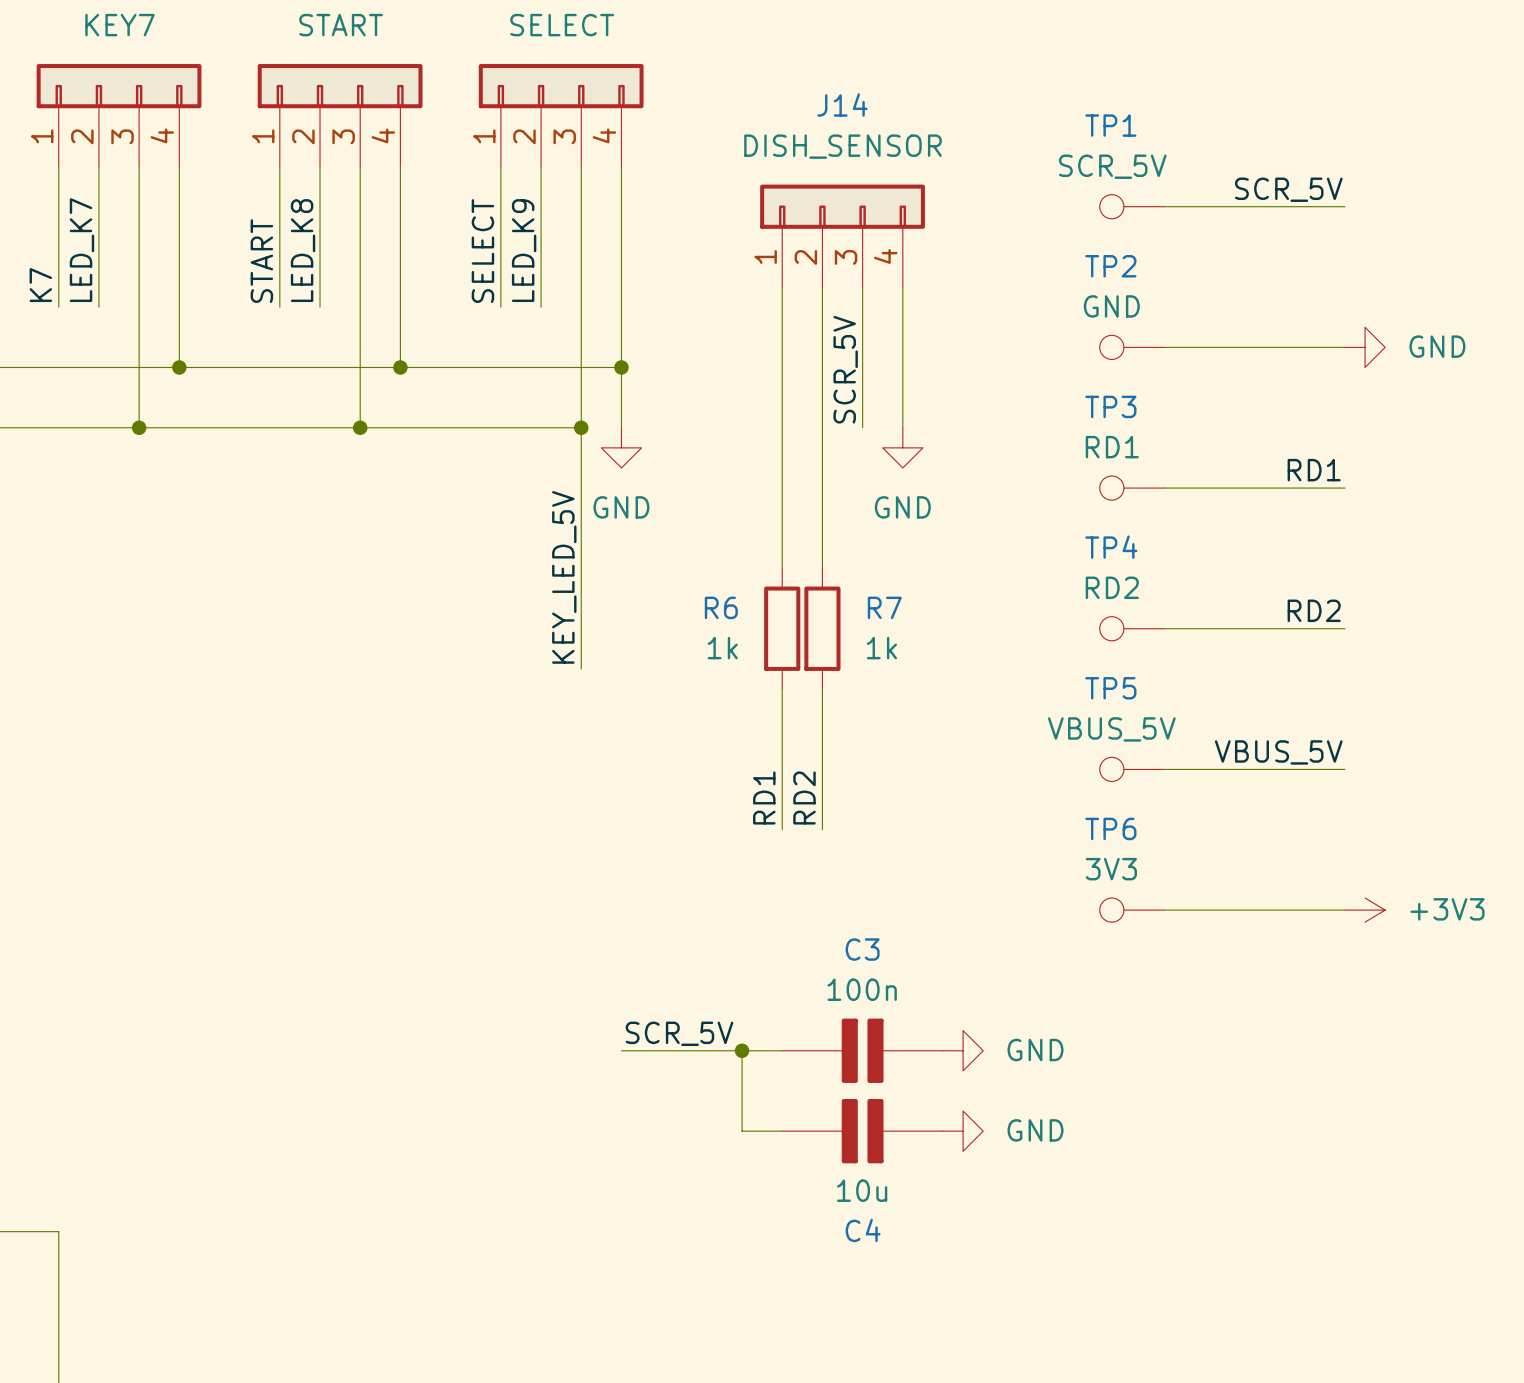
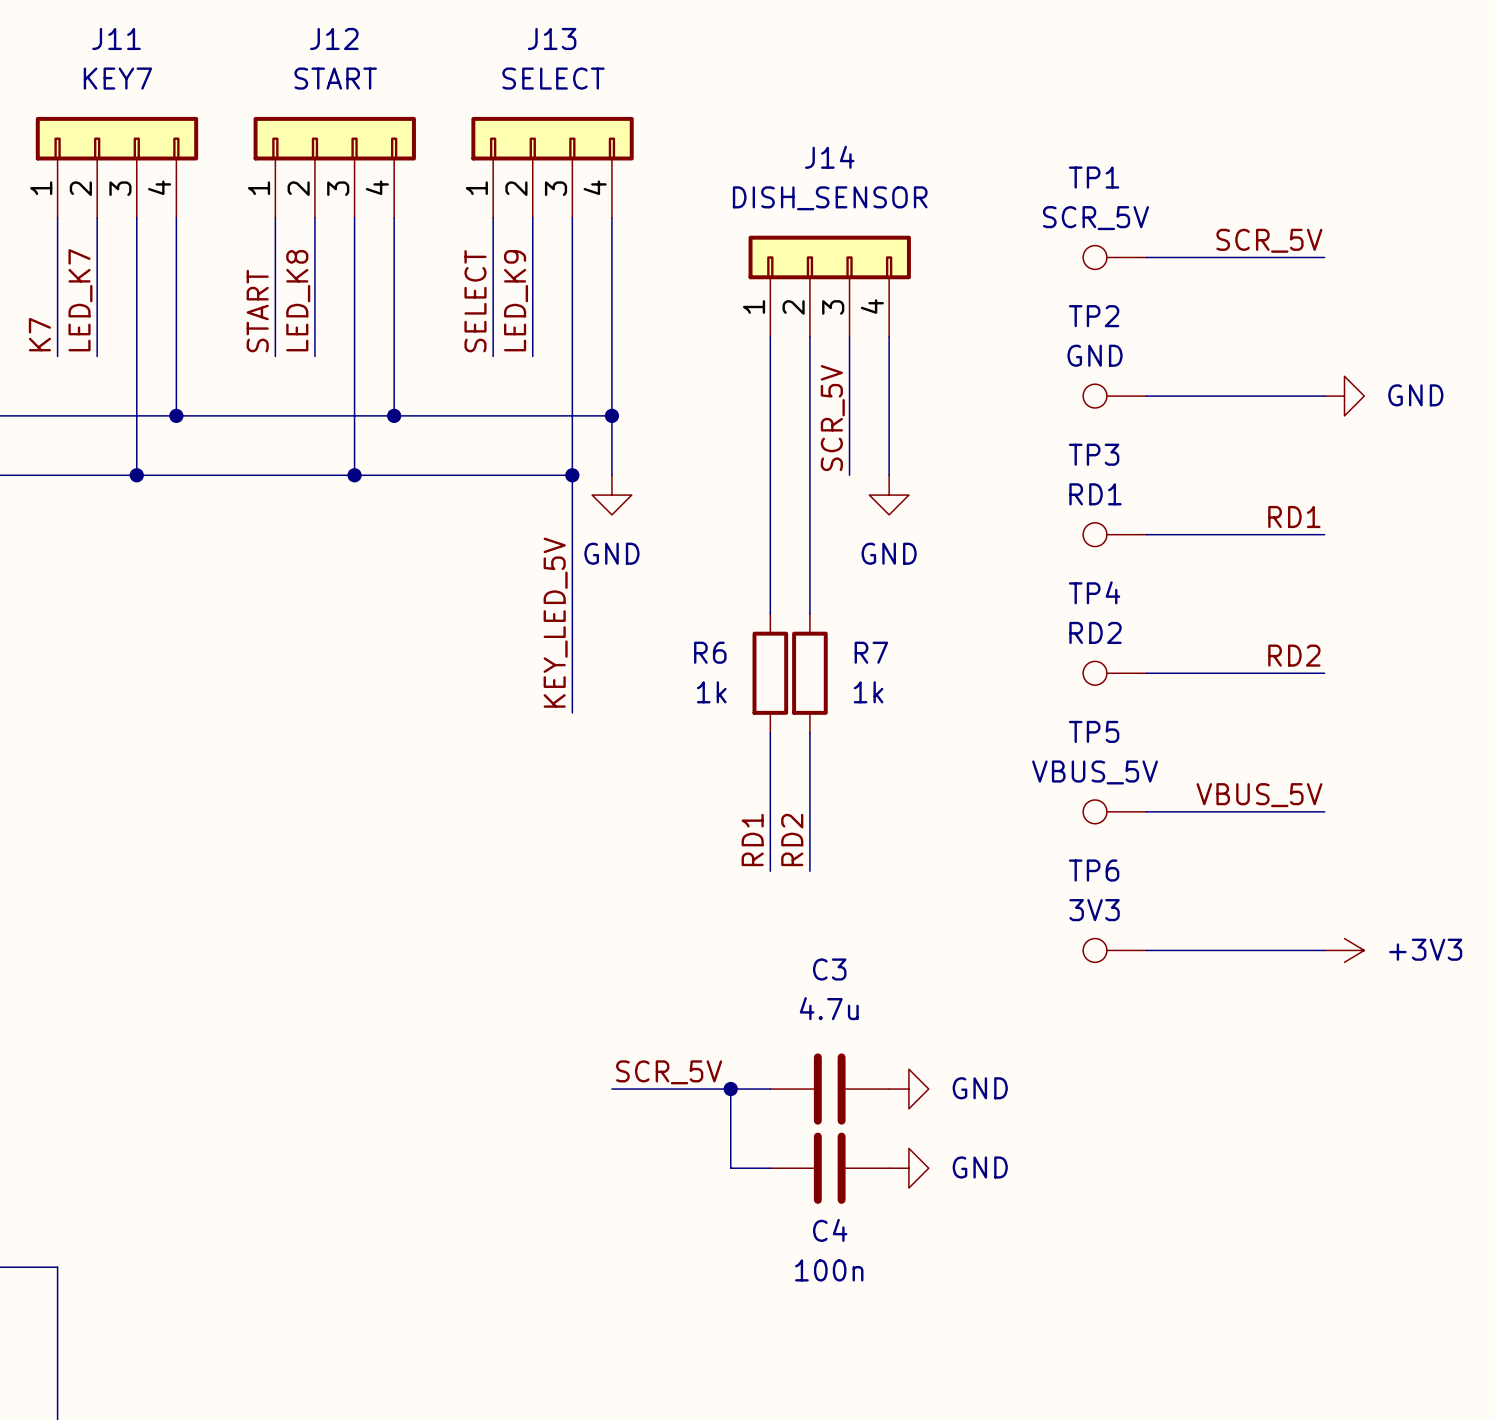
C3 value: 100n (862, 989) -> 4.7u (829, 1008)
C3 symbol: [782, 1018, 944, 1083] -> [770, 1053, 890, 1125]
power symbol position: GND (963, 1050) -> GND (908, 1089)
C4 symbol: [782, 1099, 944, 1164] -> [770, 1132, 890, 1204]
power symbol position: GND (963, 1131) -> GND (908, 1168)
C4 value: 10u (862, 1190) -> 100n (829, 1270)
C4 name position: C4 (863, 1230) -> C4 (830, 1230)

